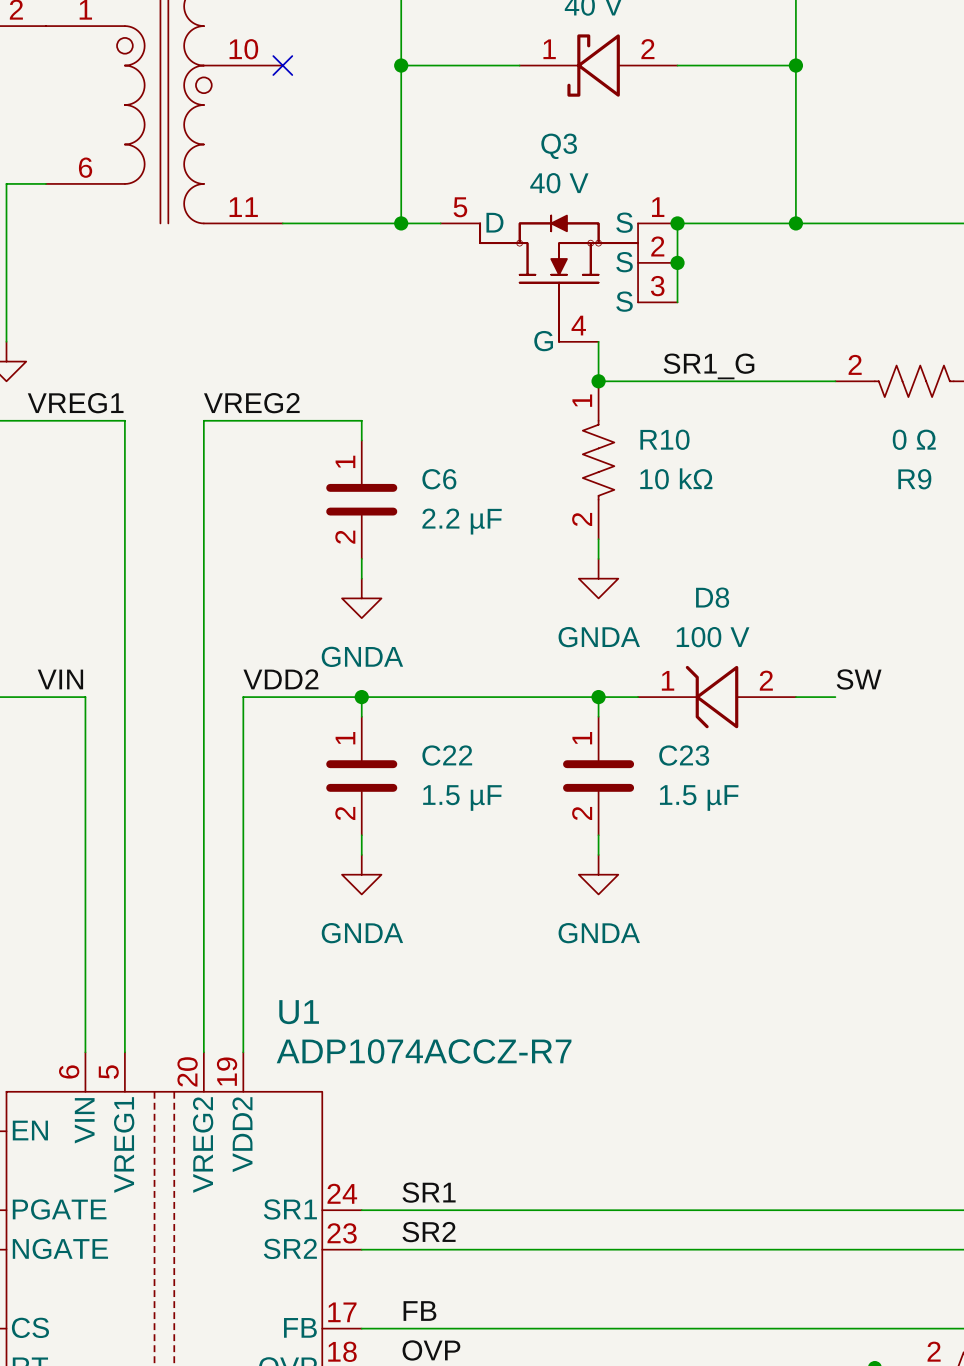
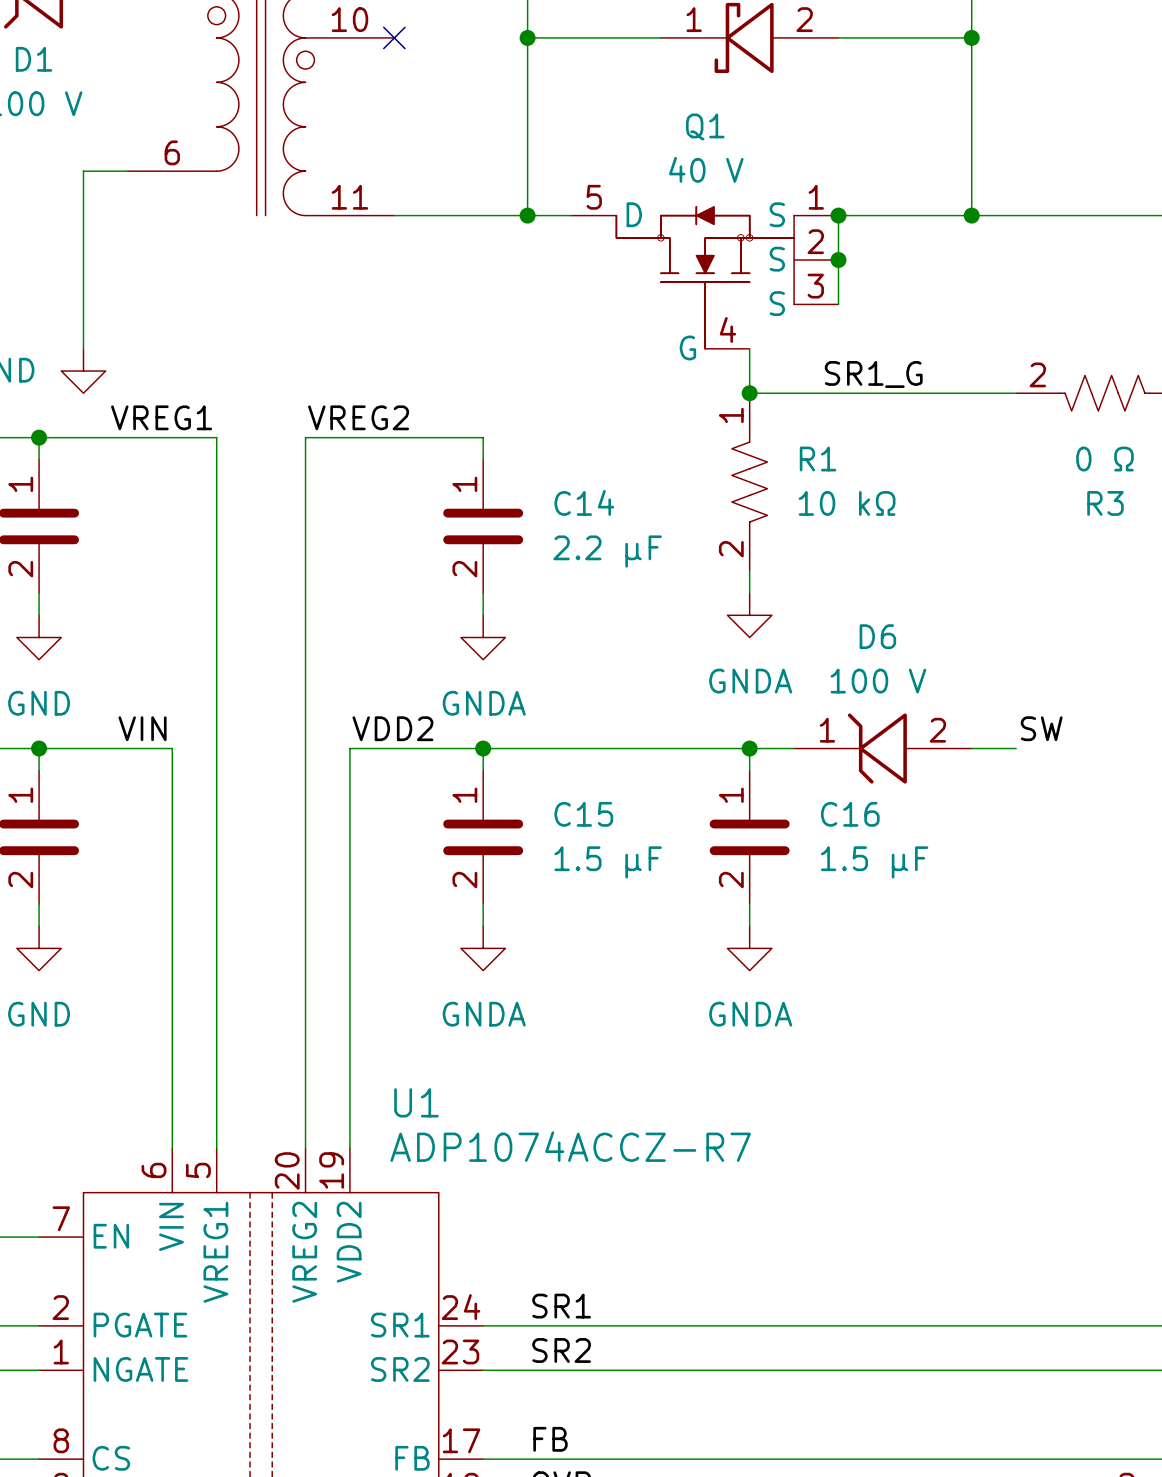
Q3 name: Q3 (559, 146) -> Q1 (705, 126)
R10 name: R10 (664, 439) -> R1 (818, 459)
C6 name: C6 (439, 479) -> C14 (584, 502)
R9 name: R9 (914, 479) -> R3 (1105, 503)
D8 name: D8 (712, 597) -> D6 (877, 636)
C22 name: C22 (447, 755) -> C15 (583, 814)
C23 name: C23 (684, 755) -> C16 (850, 814)

